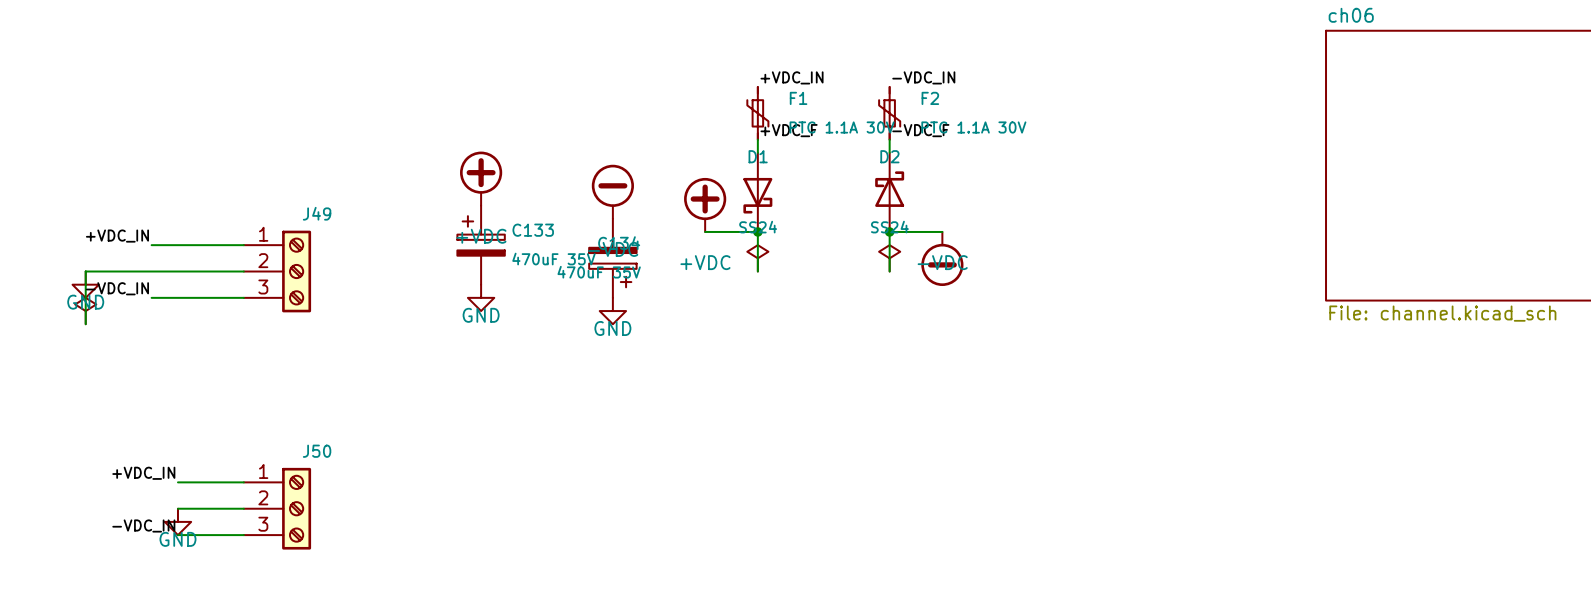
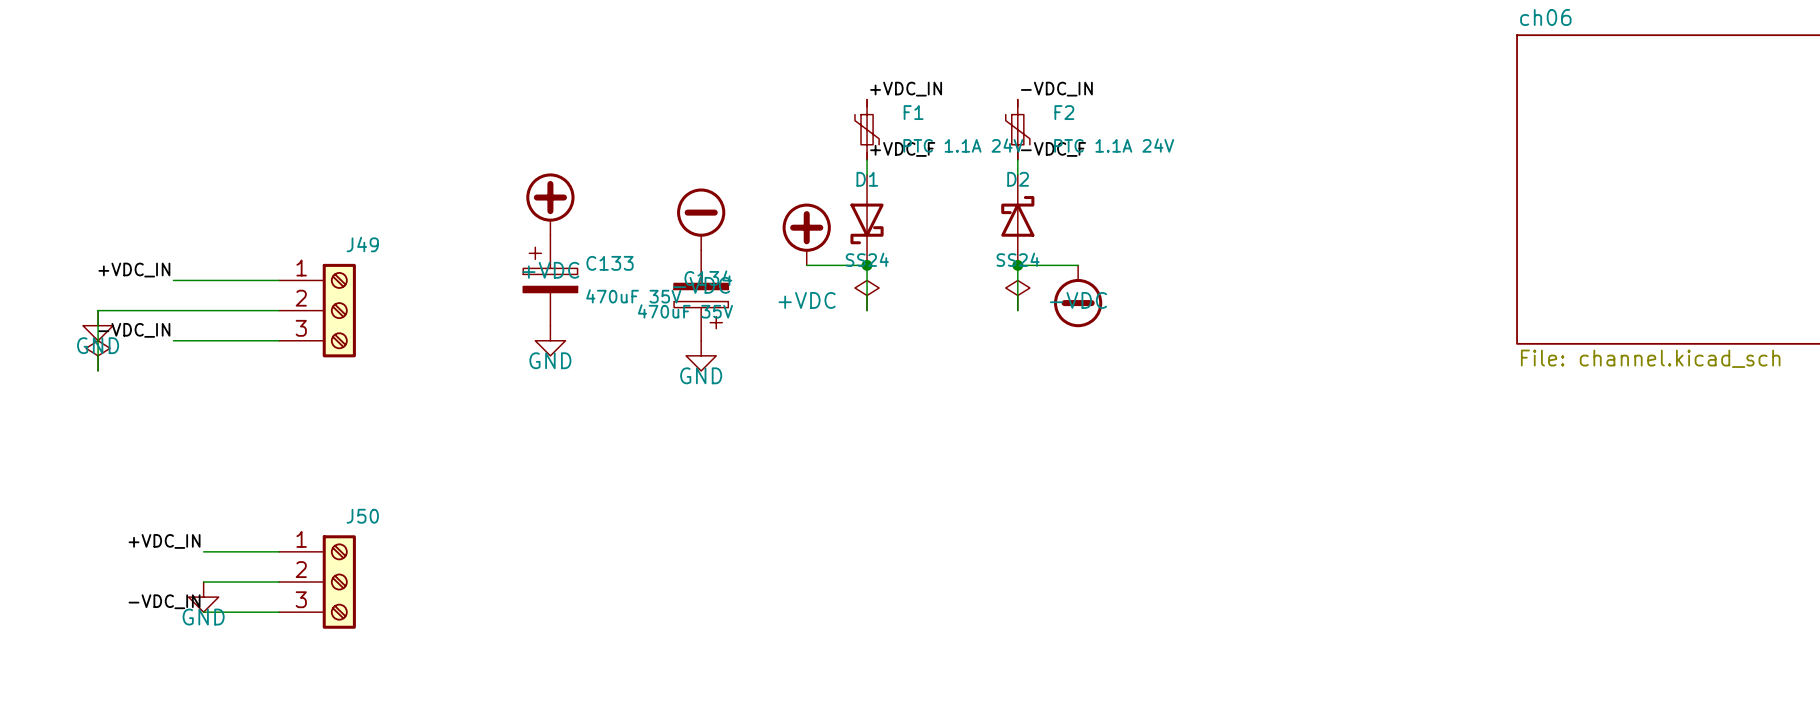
F1 value: PTC 1.1A 30V (842, 127) -> PTC 1.1A 24V (963, 145)
F2 value: PTC 1.1A 30V (973, 127) -> PTC 1.1A 24V (1114, 145)

